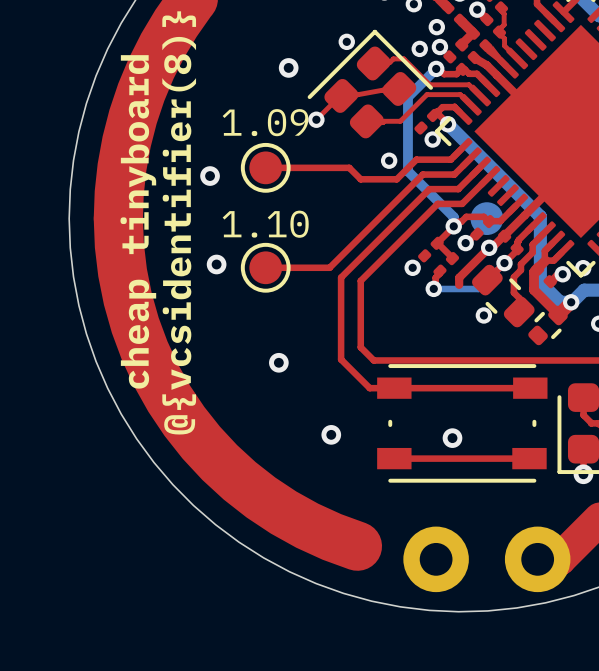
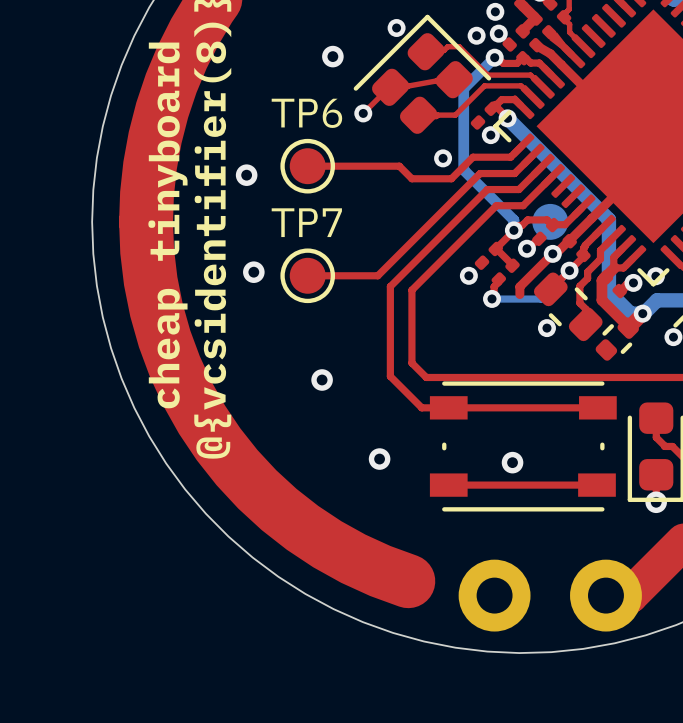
TP6 name: none -> TP6 (306, 113)
text: 1.09 (265, 122) -> none
TP7 name: none -> TP7 (306, 222)
text: 1.10 (265, 224) -> none

